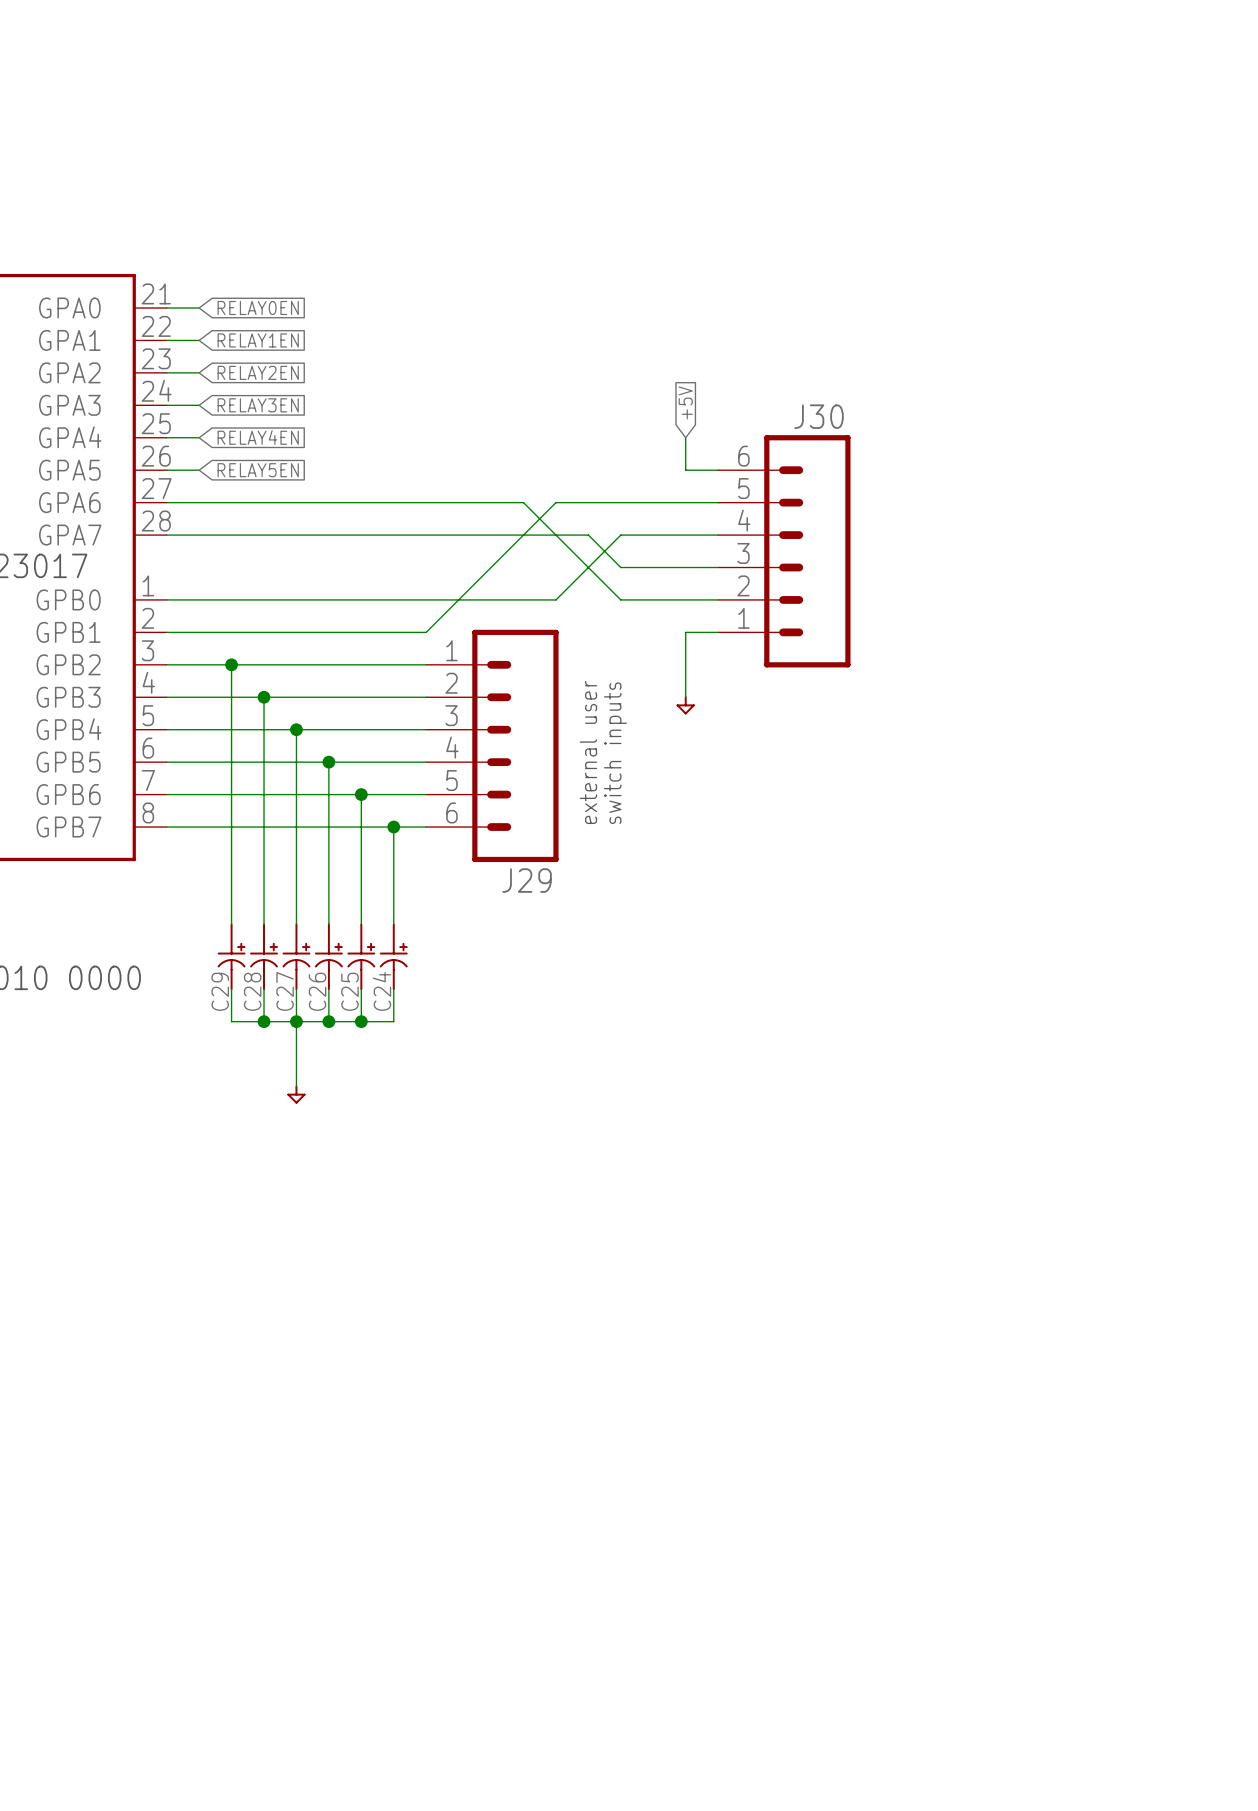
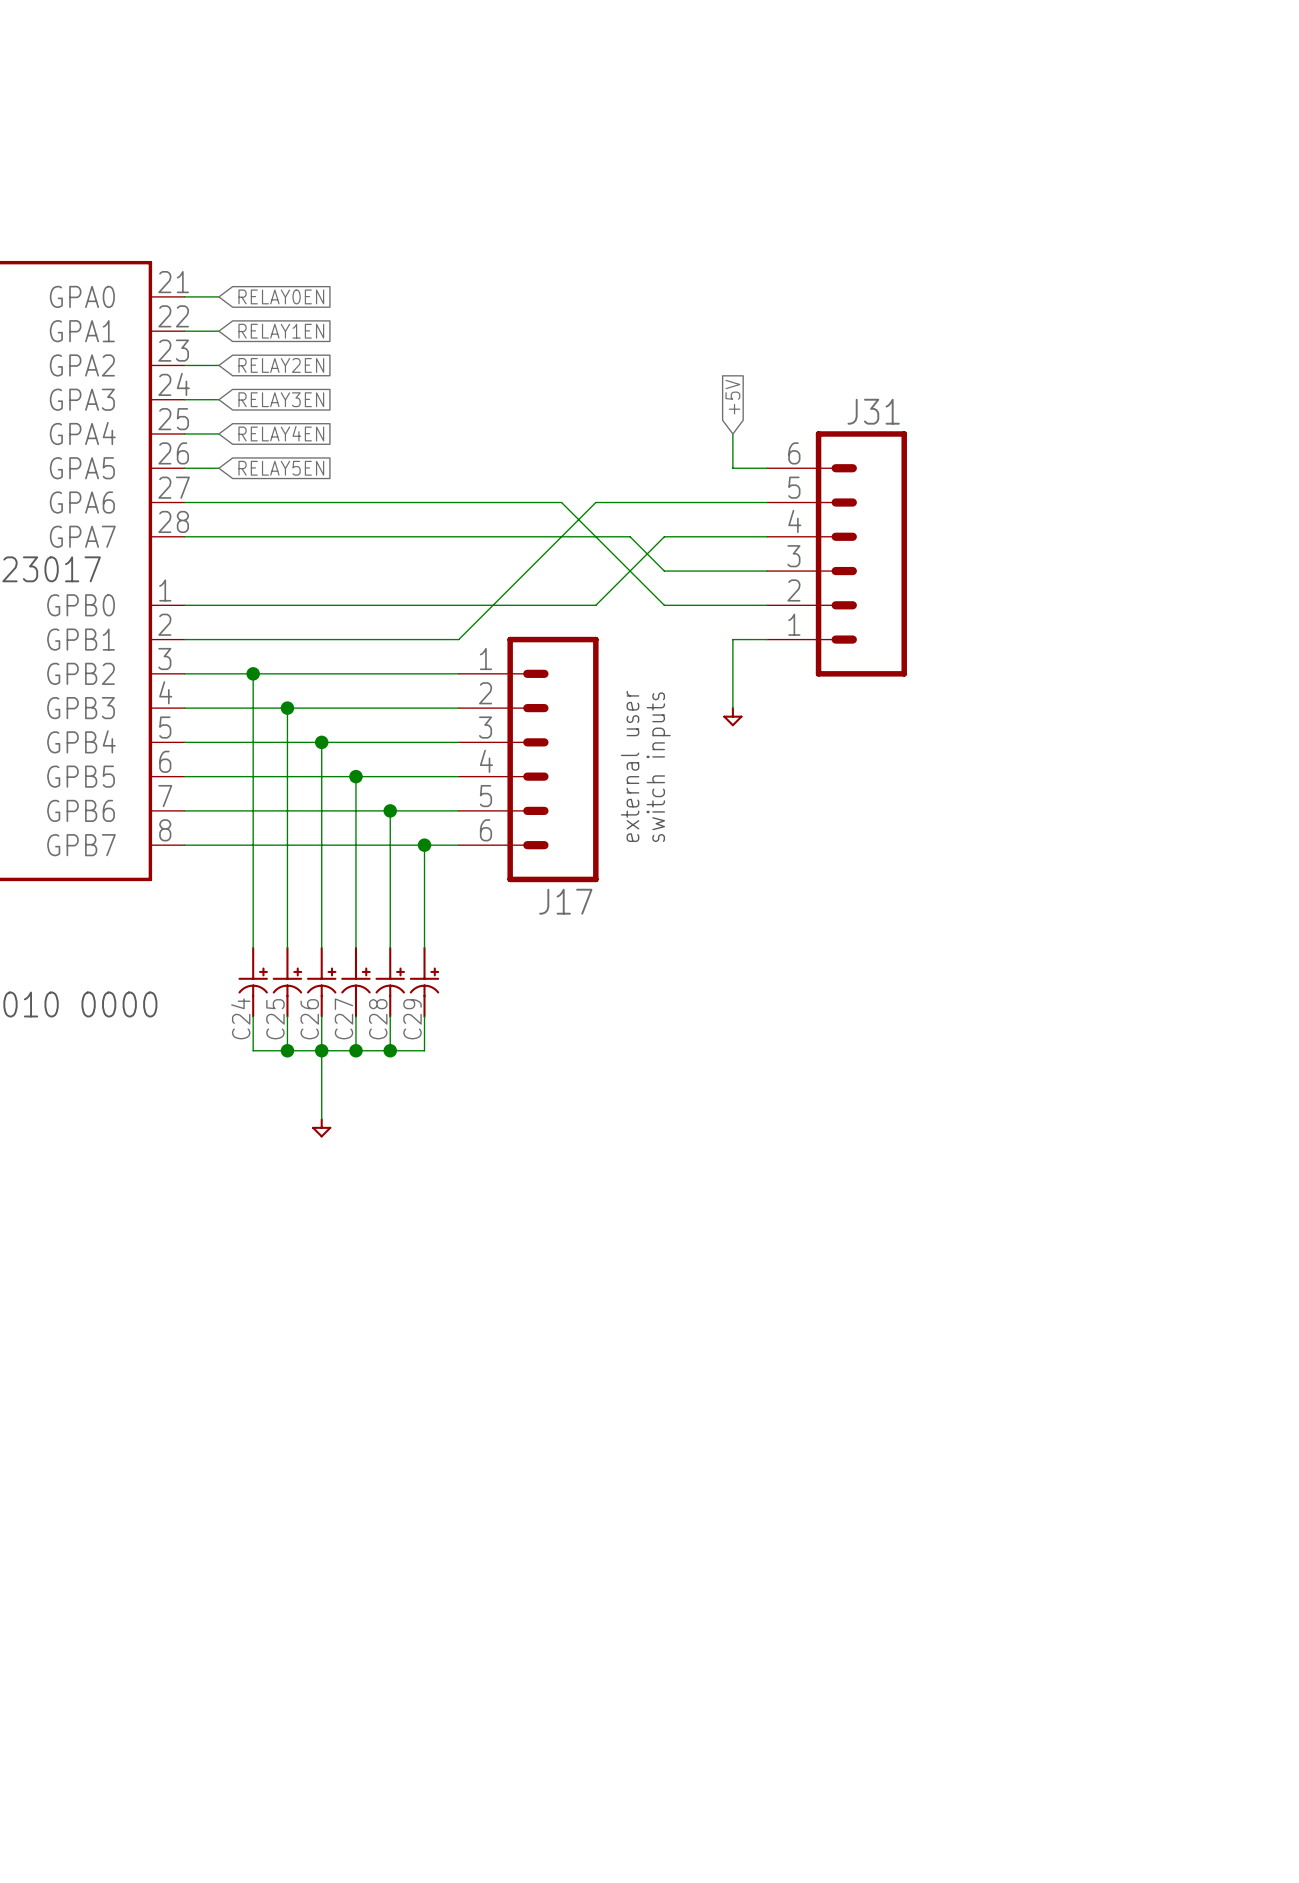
J30 name: J30 (818, 416) -> J31 (873, 411)
J29 name: J29 (527, 880) -> J17 (565, 901)
C29 name: C29 (220, 991) -> C24 (240, 1018)
C28 name: C28 (252, 991) -> C25 (275, 1019)
C27 name: C27 (285, 991) -> C26 (309, 1019)
C26 name: C26 (317, 991) -> C27 (343, 1018)
C25 name: C25 (349, 991) -> C28 (378, 1019)
C24 name: C24 (382, 991) -> C29 (412, 1019)

